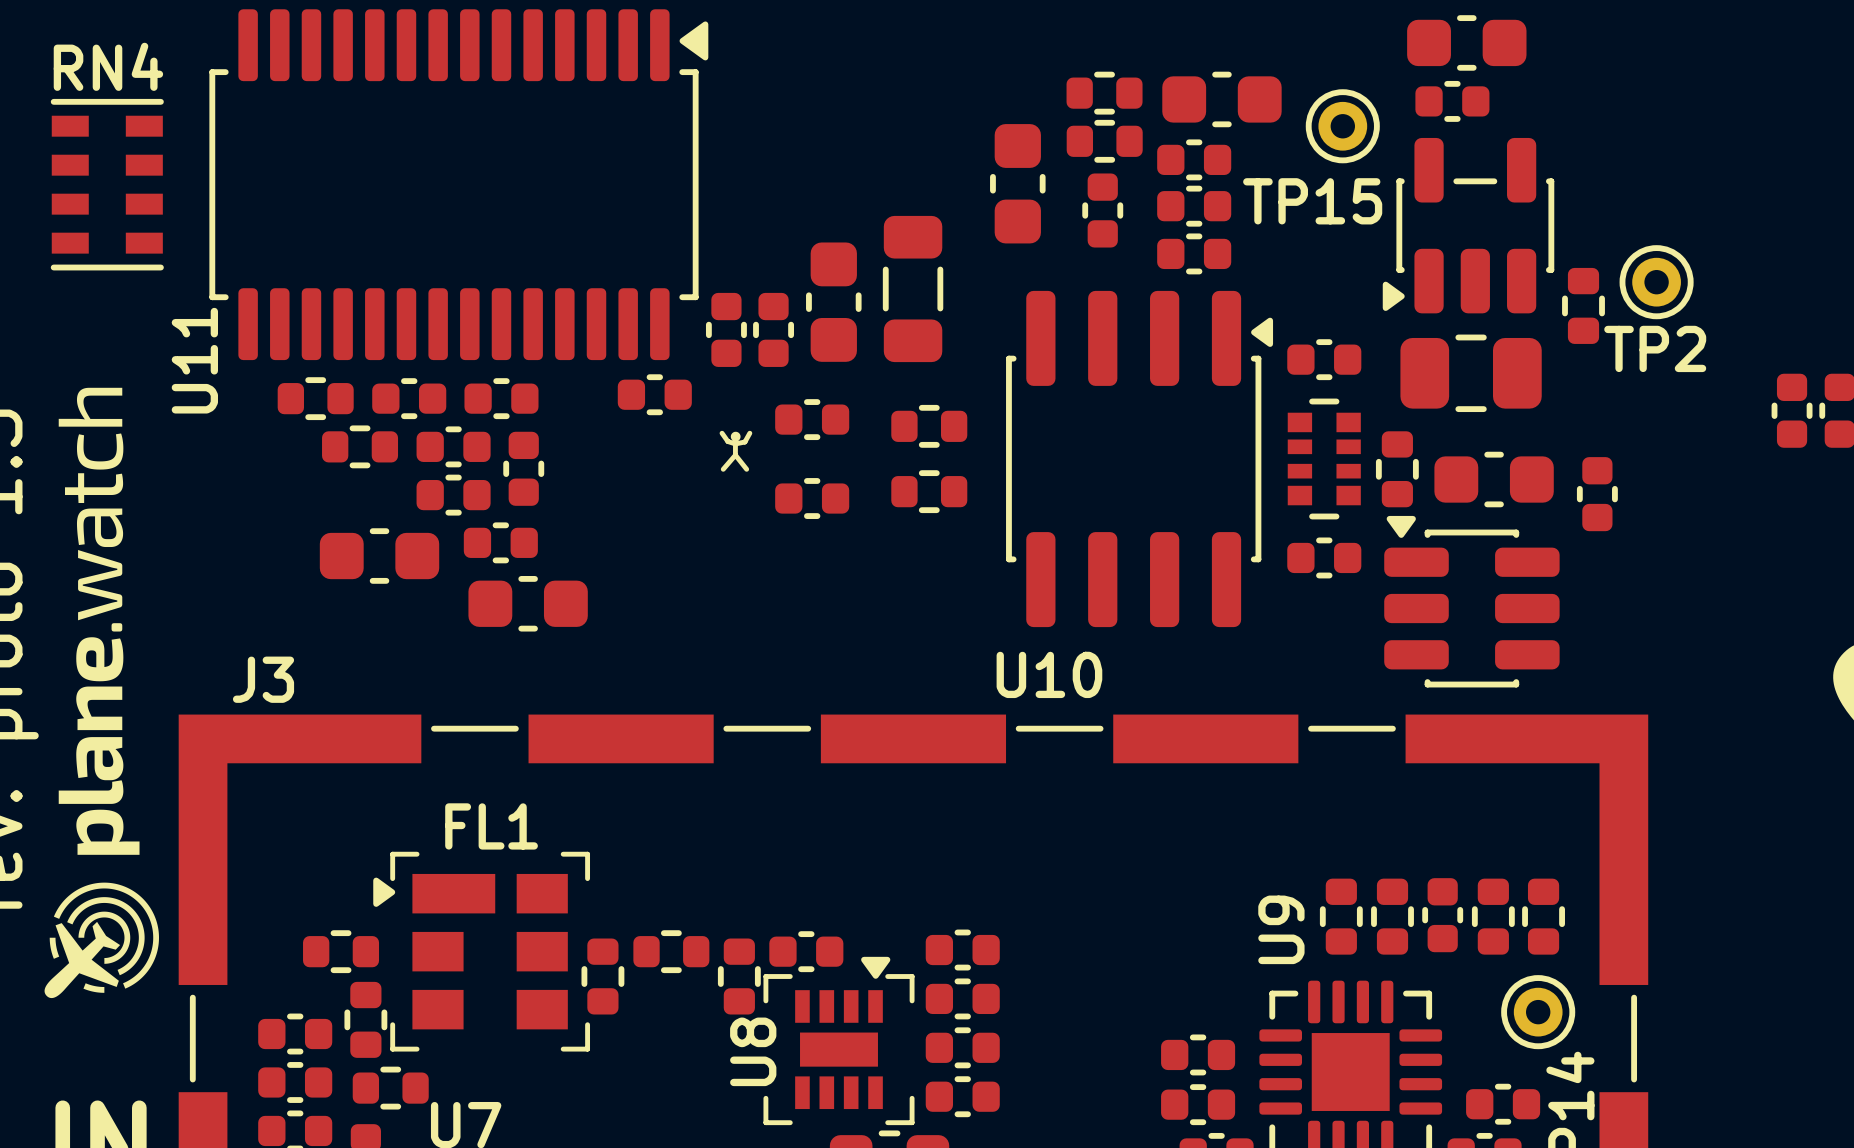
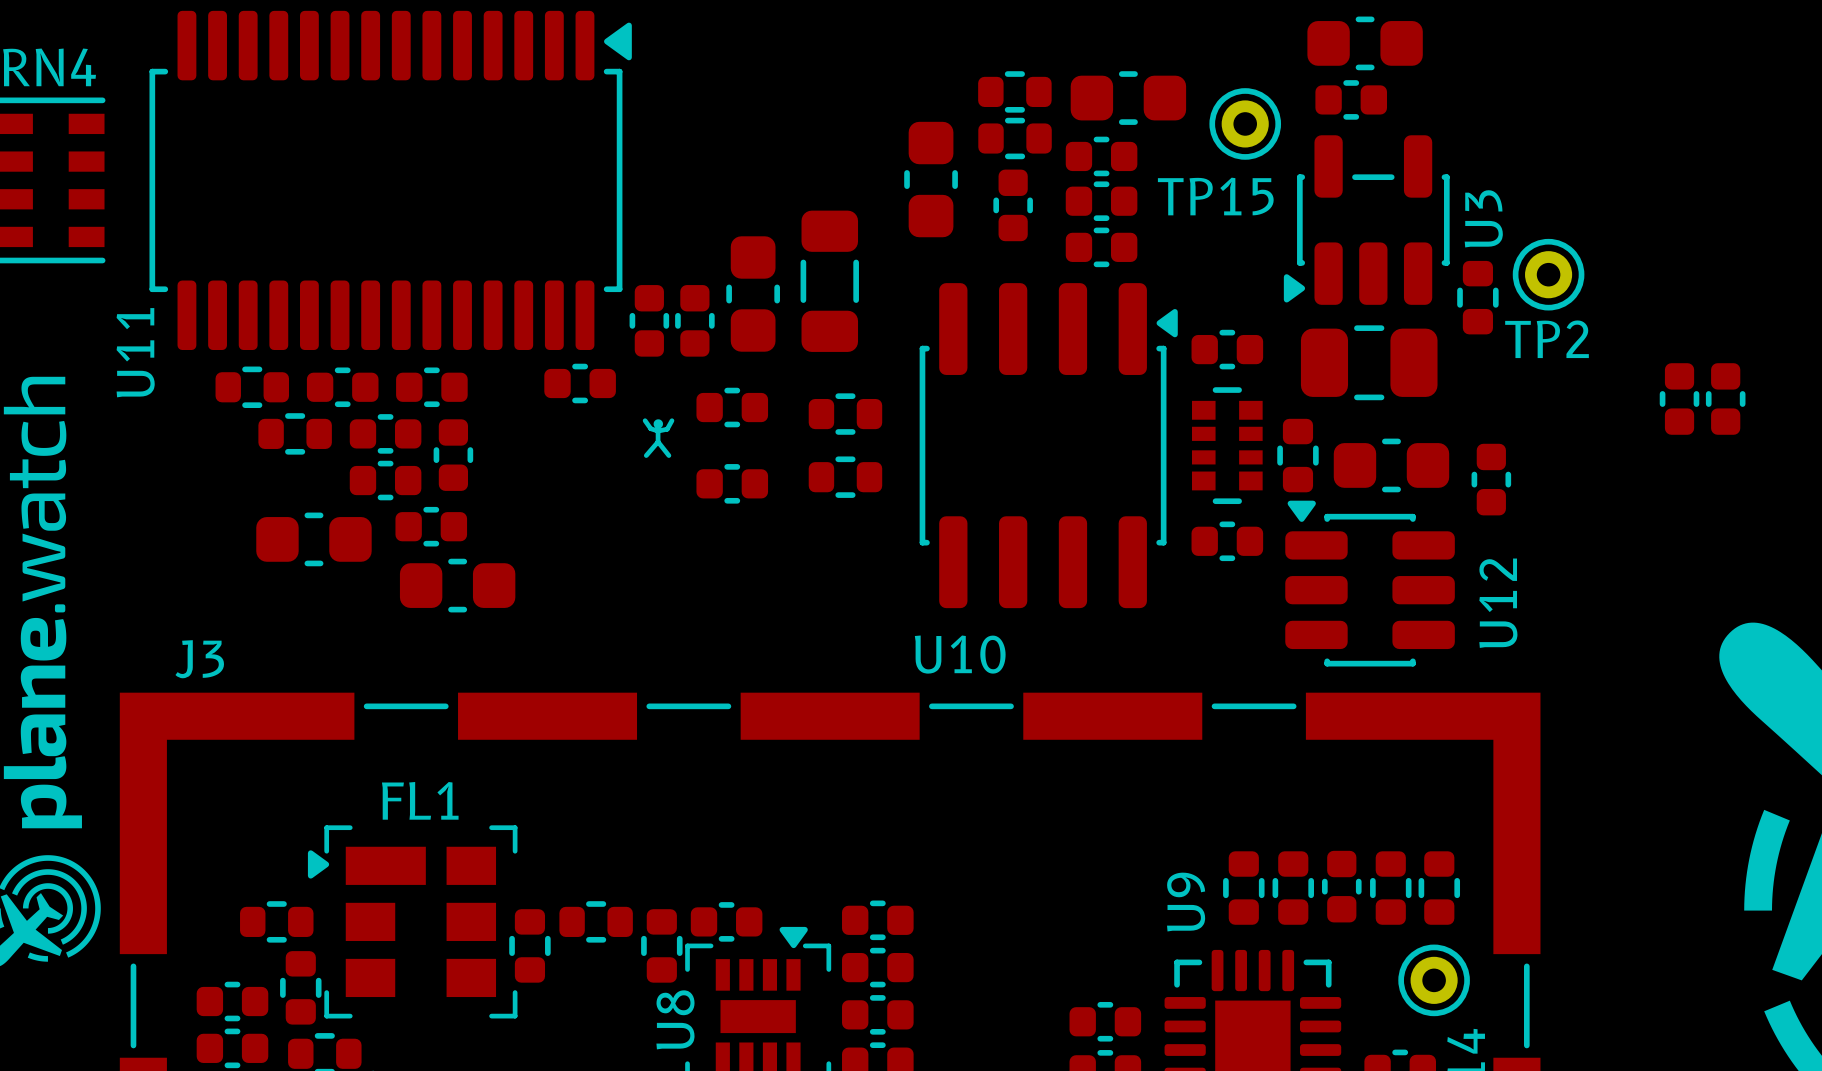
U3 name: none -> U3 (1483, 218)
U12 name: none -> U12 (1498, 603)

